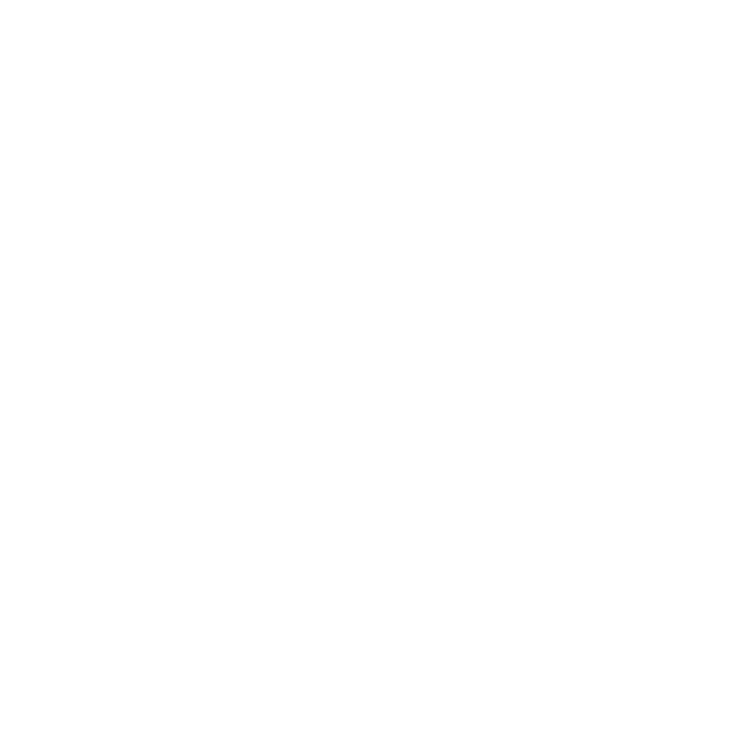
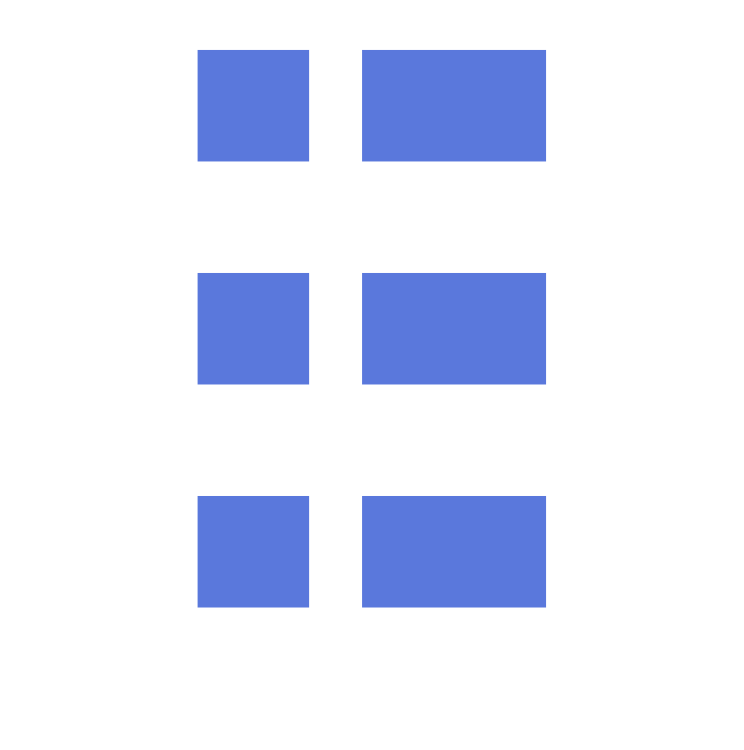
part: none -> (371, 328)

